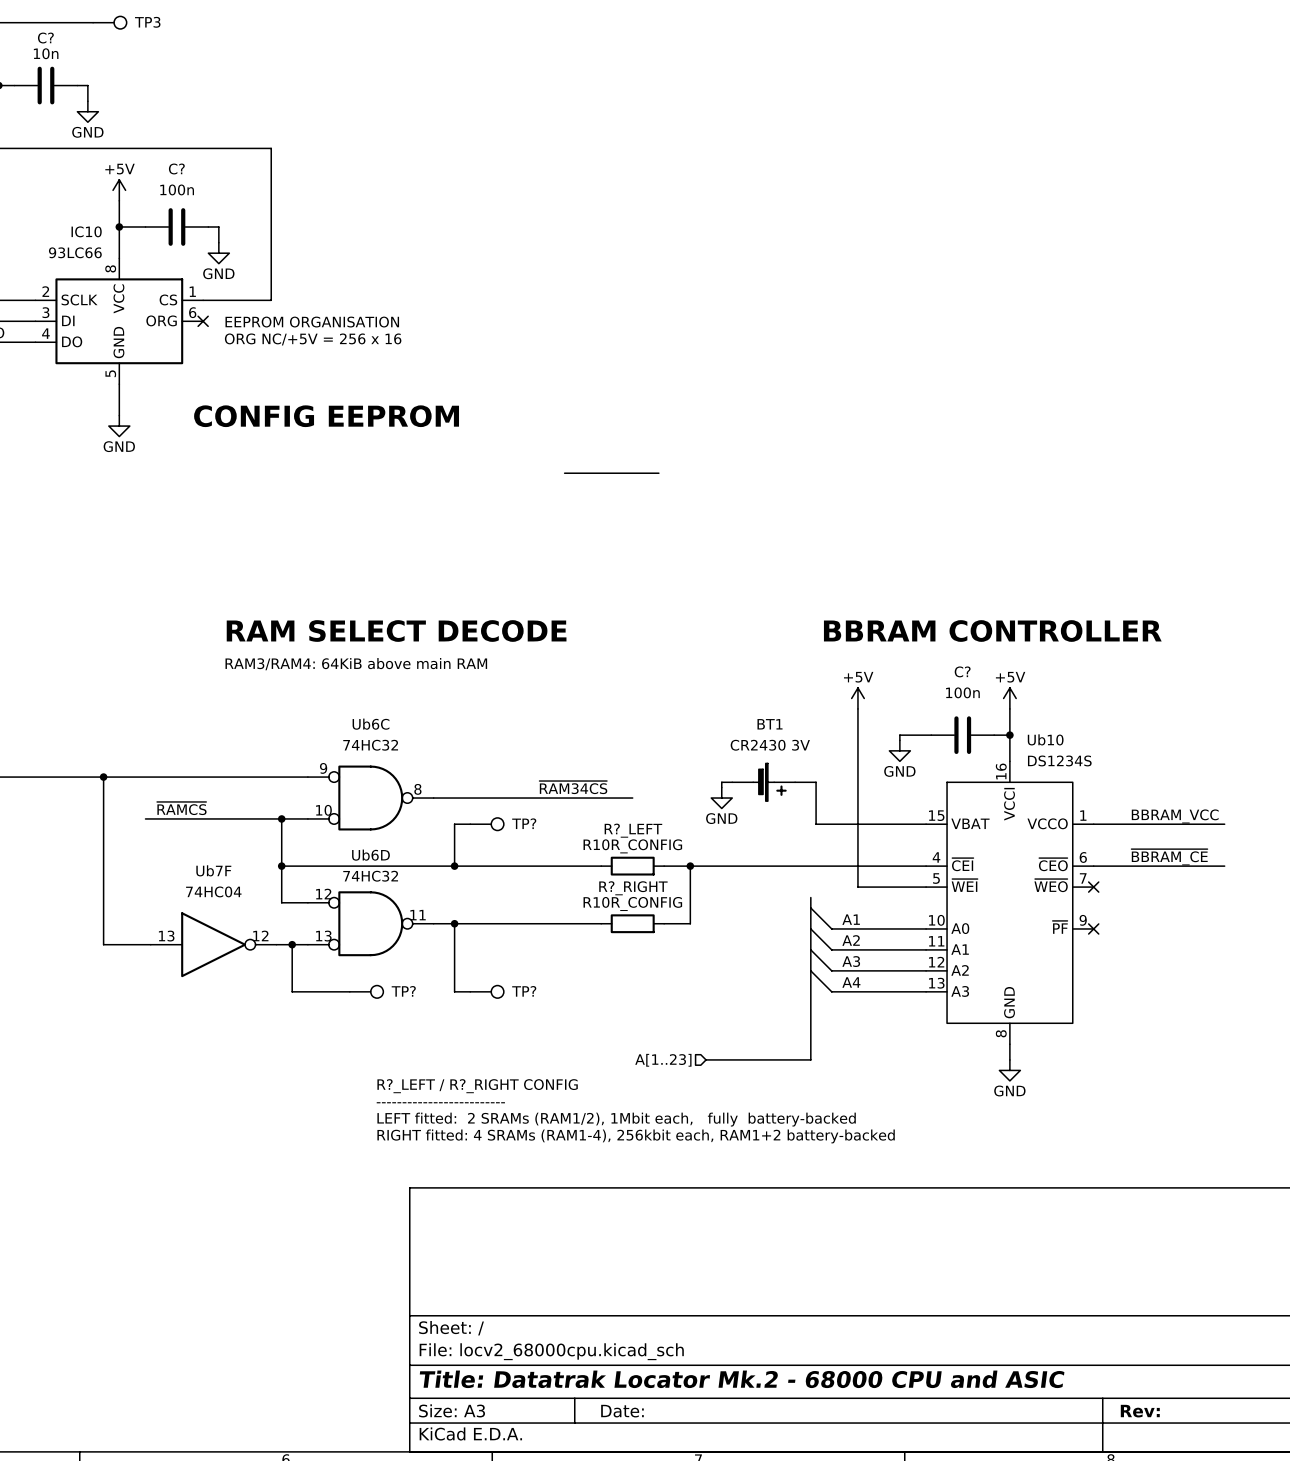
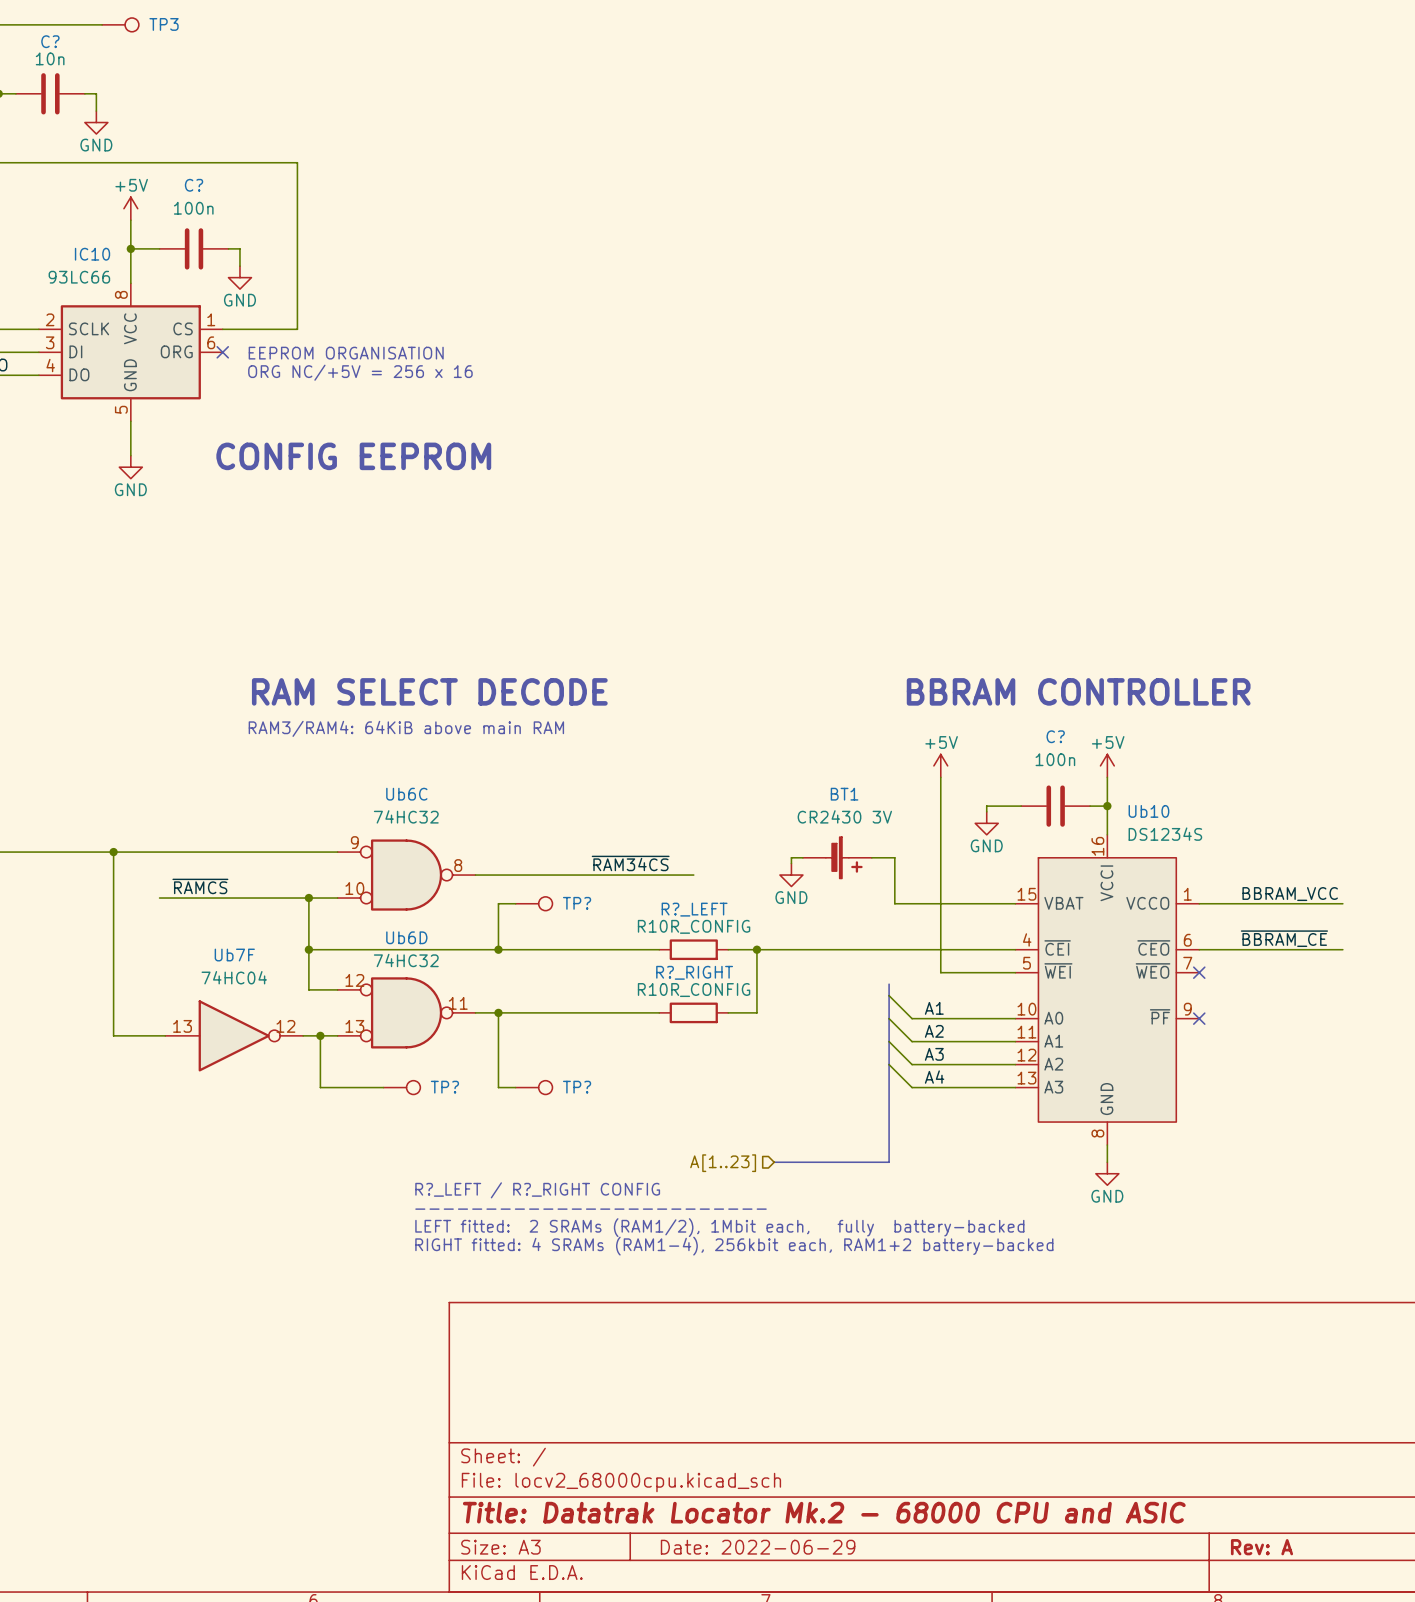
wire: (564, 473) (658, 473) -> none
title block: Date: (622, 1411) -> Date: 2022-06-29 (758, 1547)
title block: Rev: (1140, 1411) -> Rev: A (1262, 1547)

